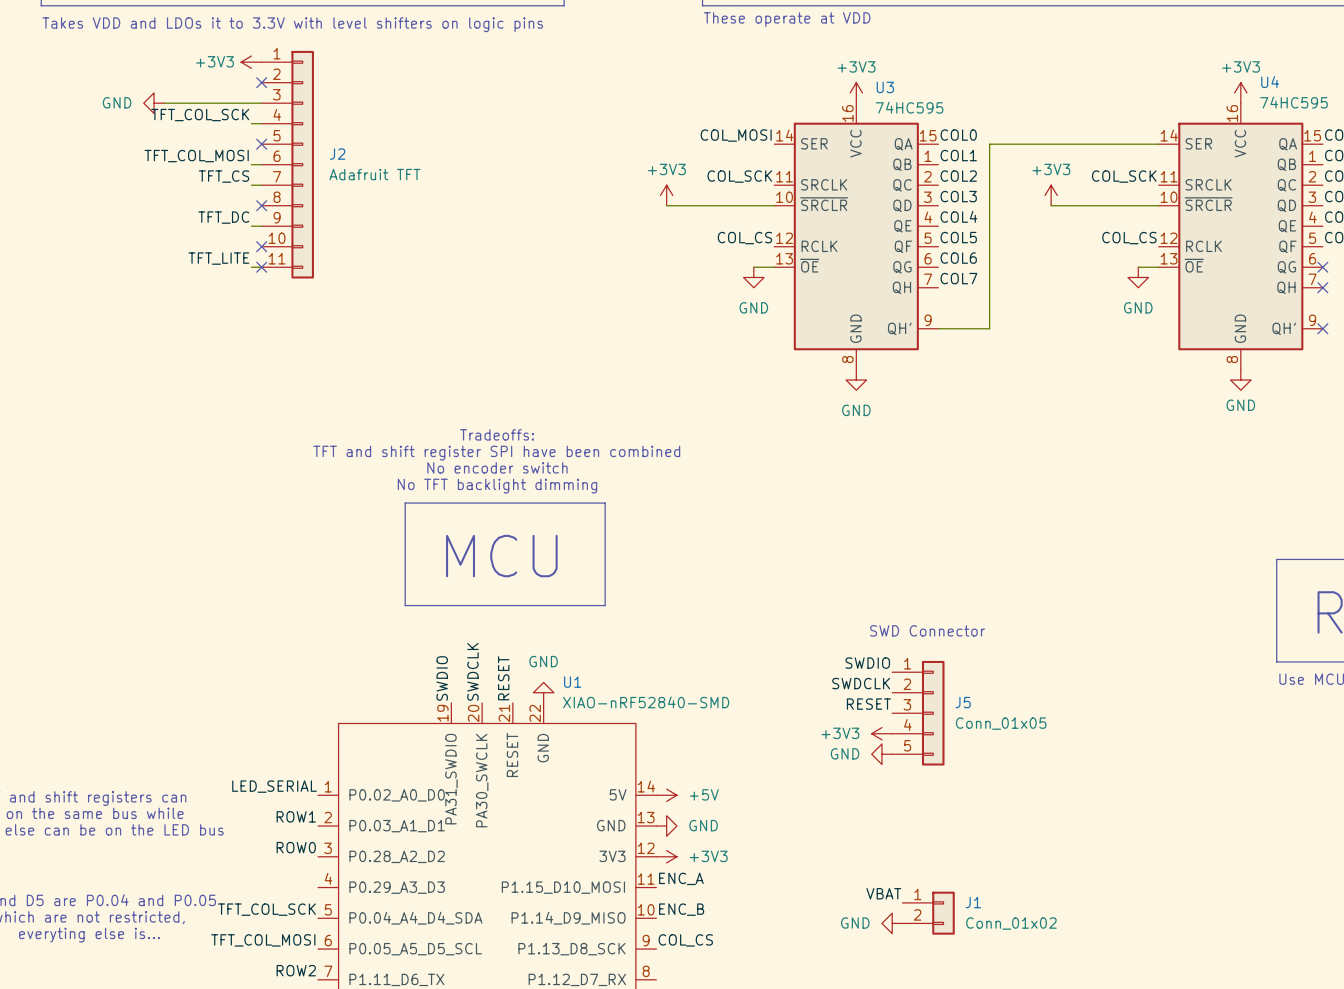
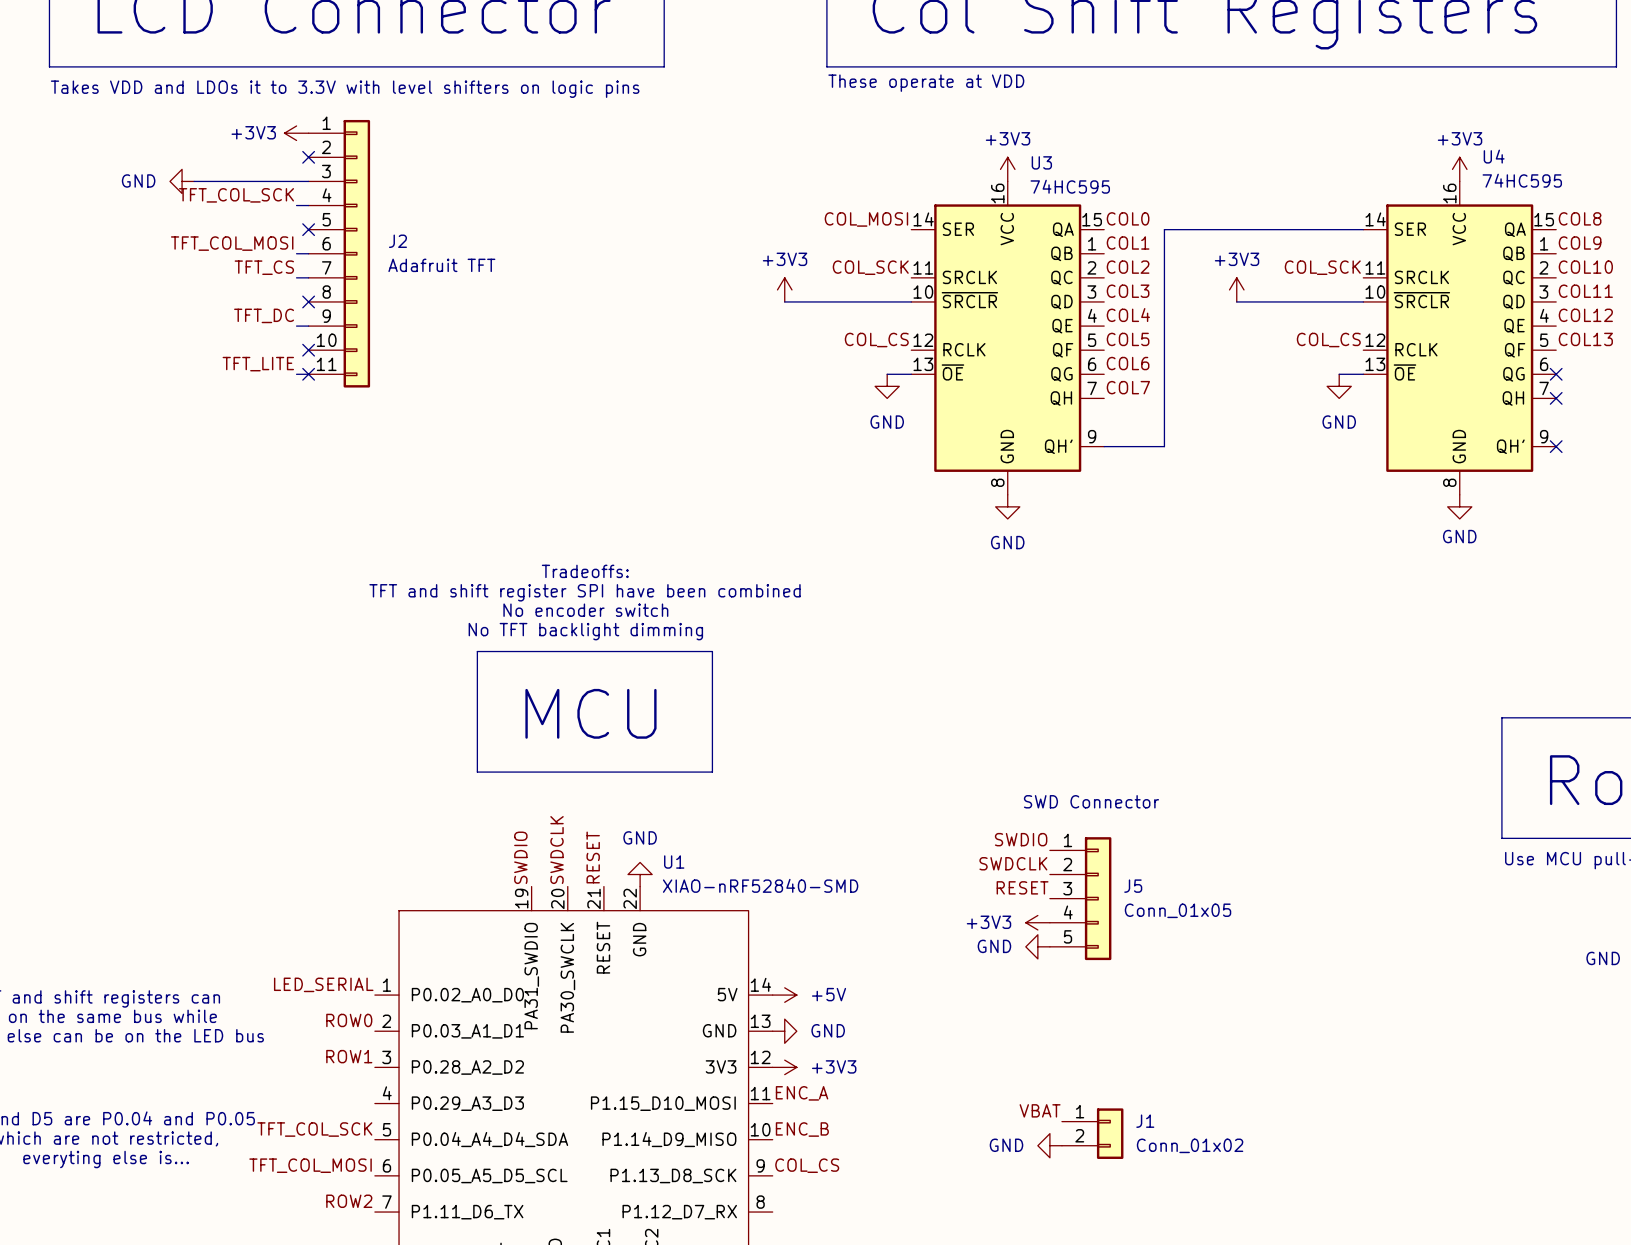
label: ROW1 (296, 816) -> ROW0 (349, 1020)
label: ROW0 (296, 847) -> ROW1 (349, 1056)

